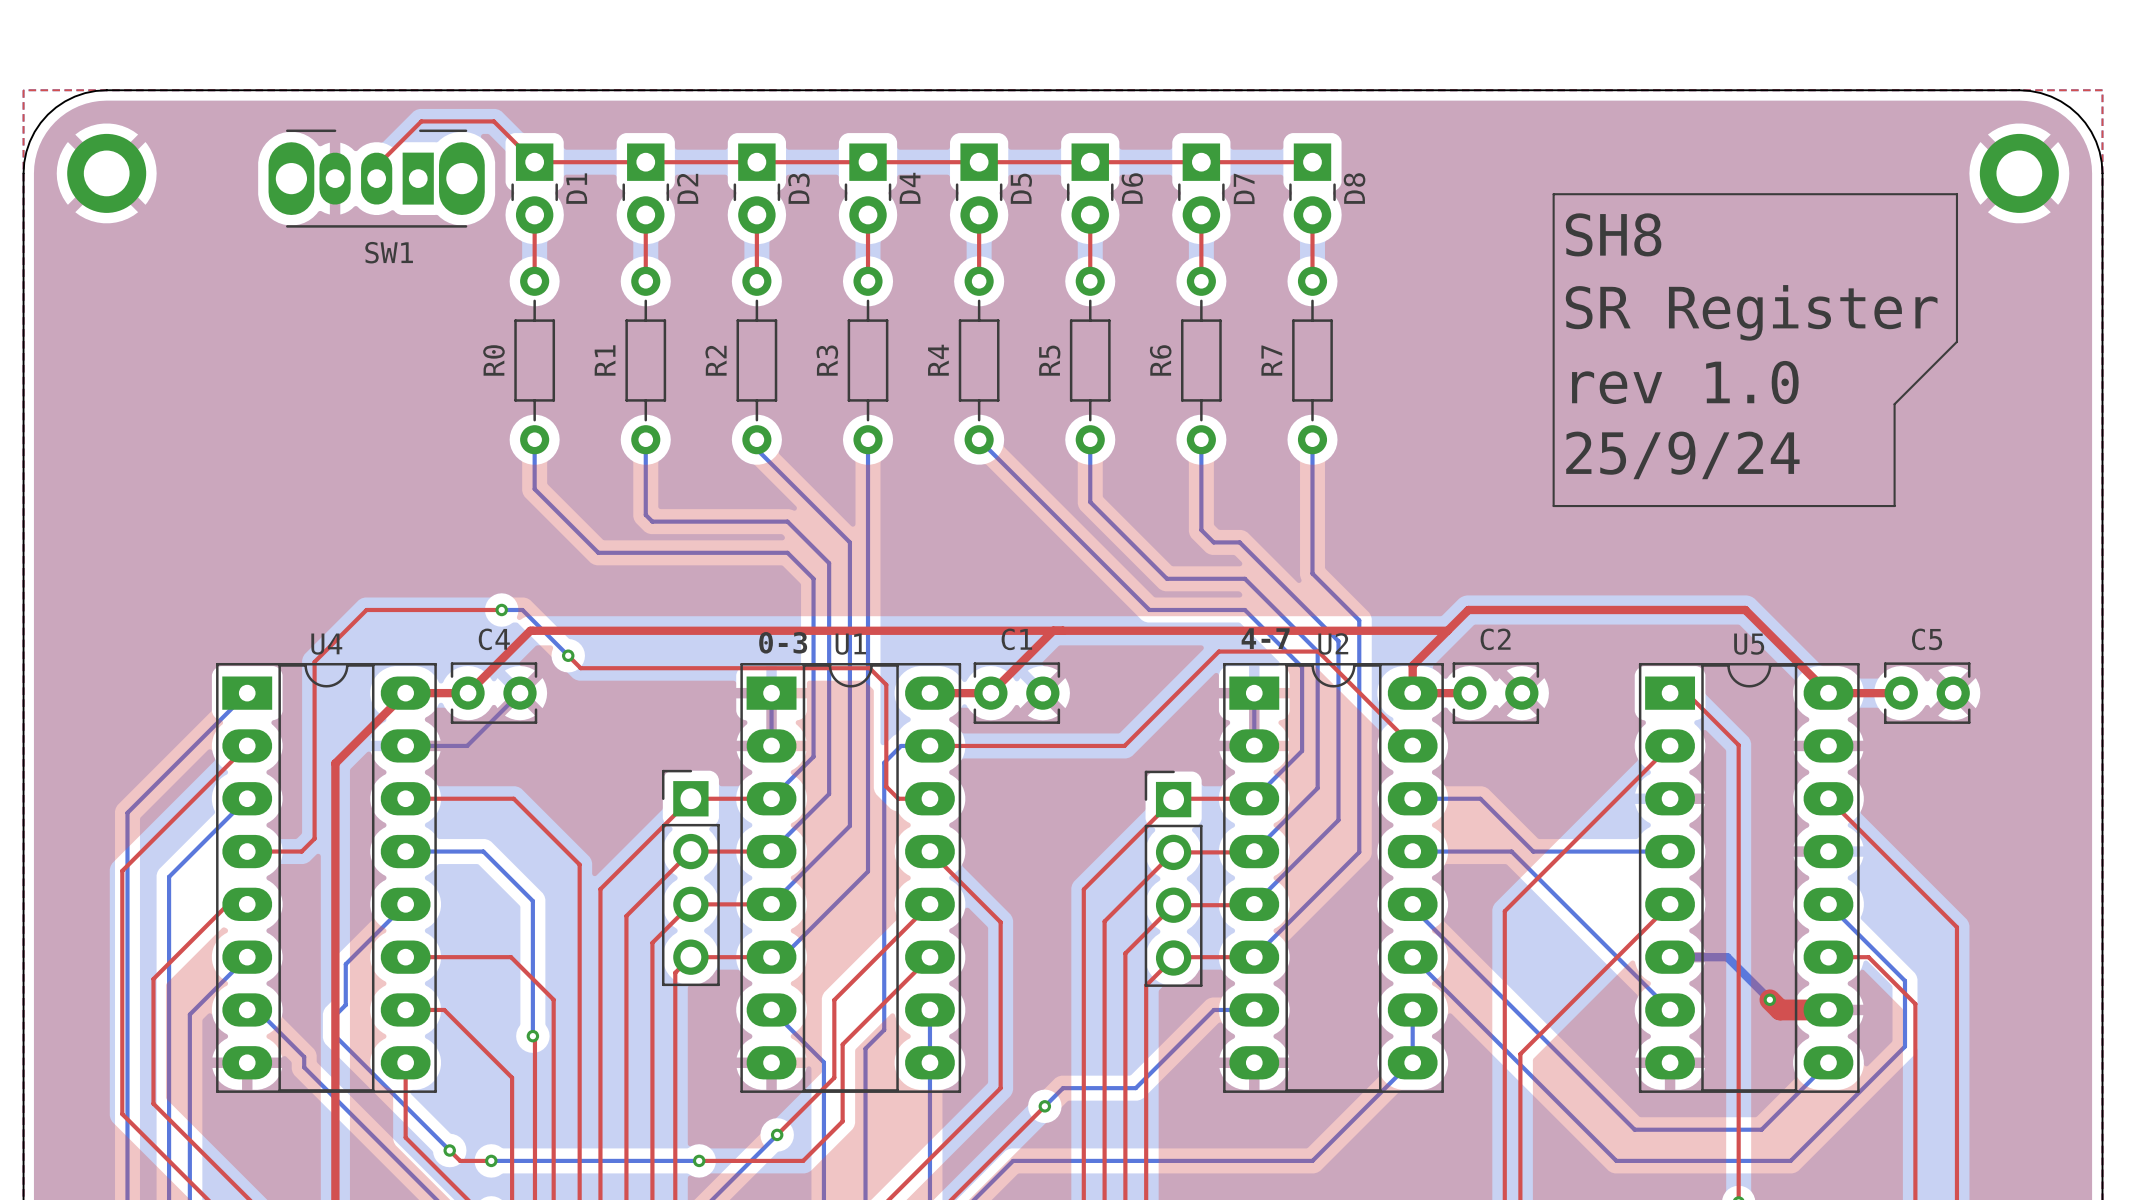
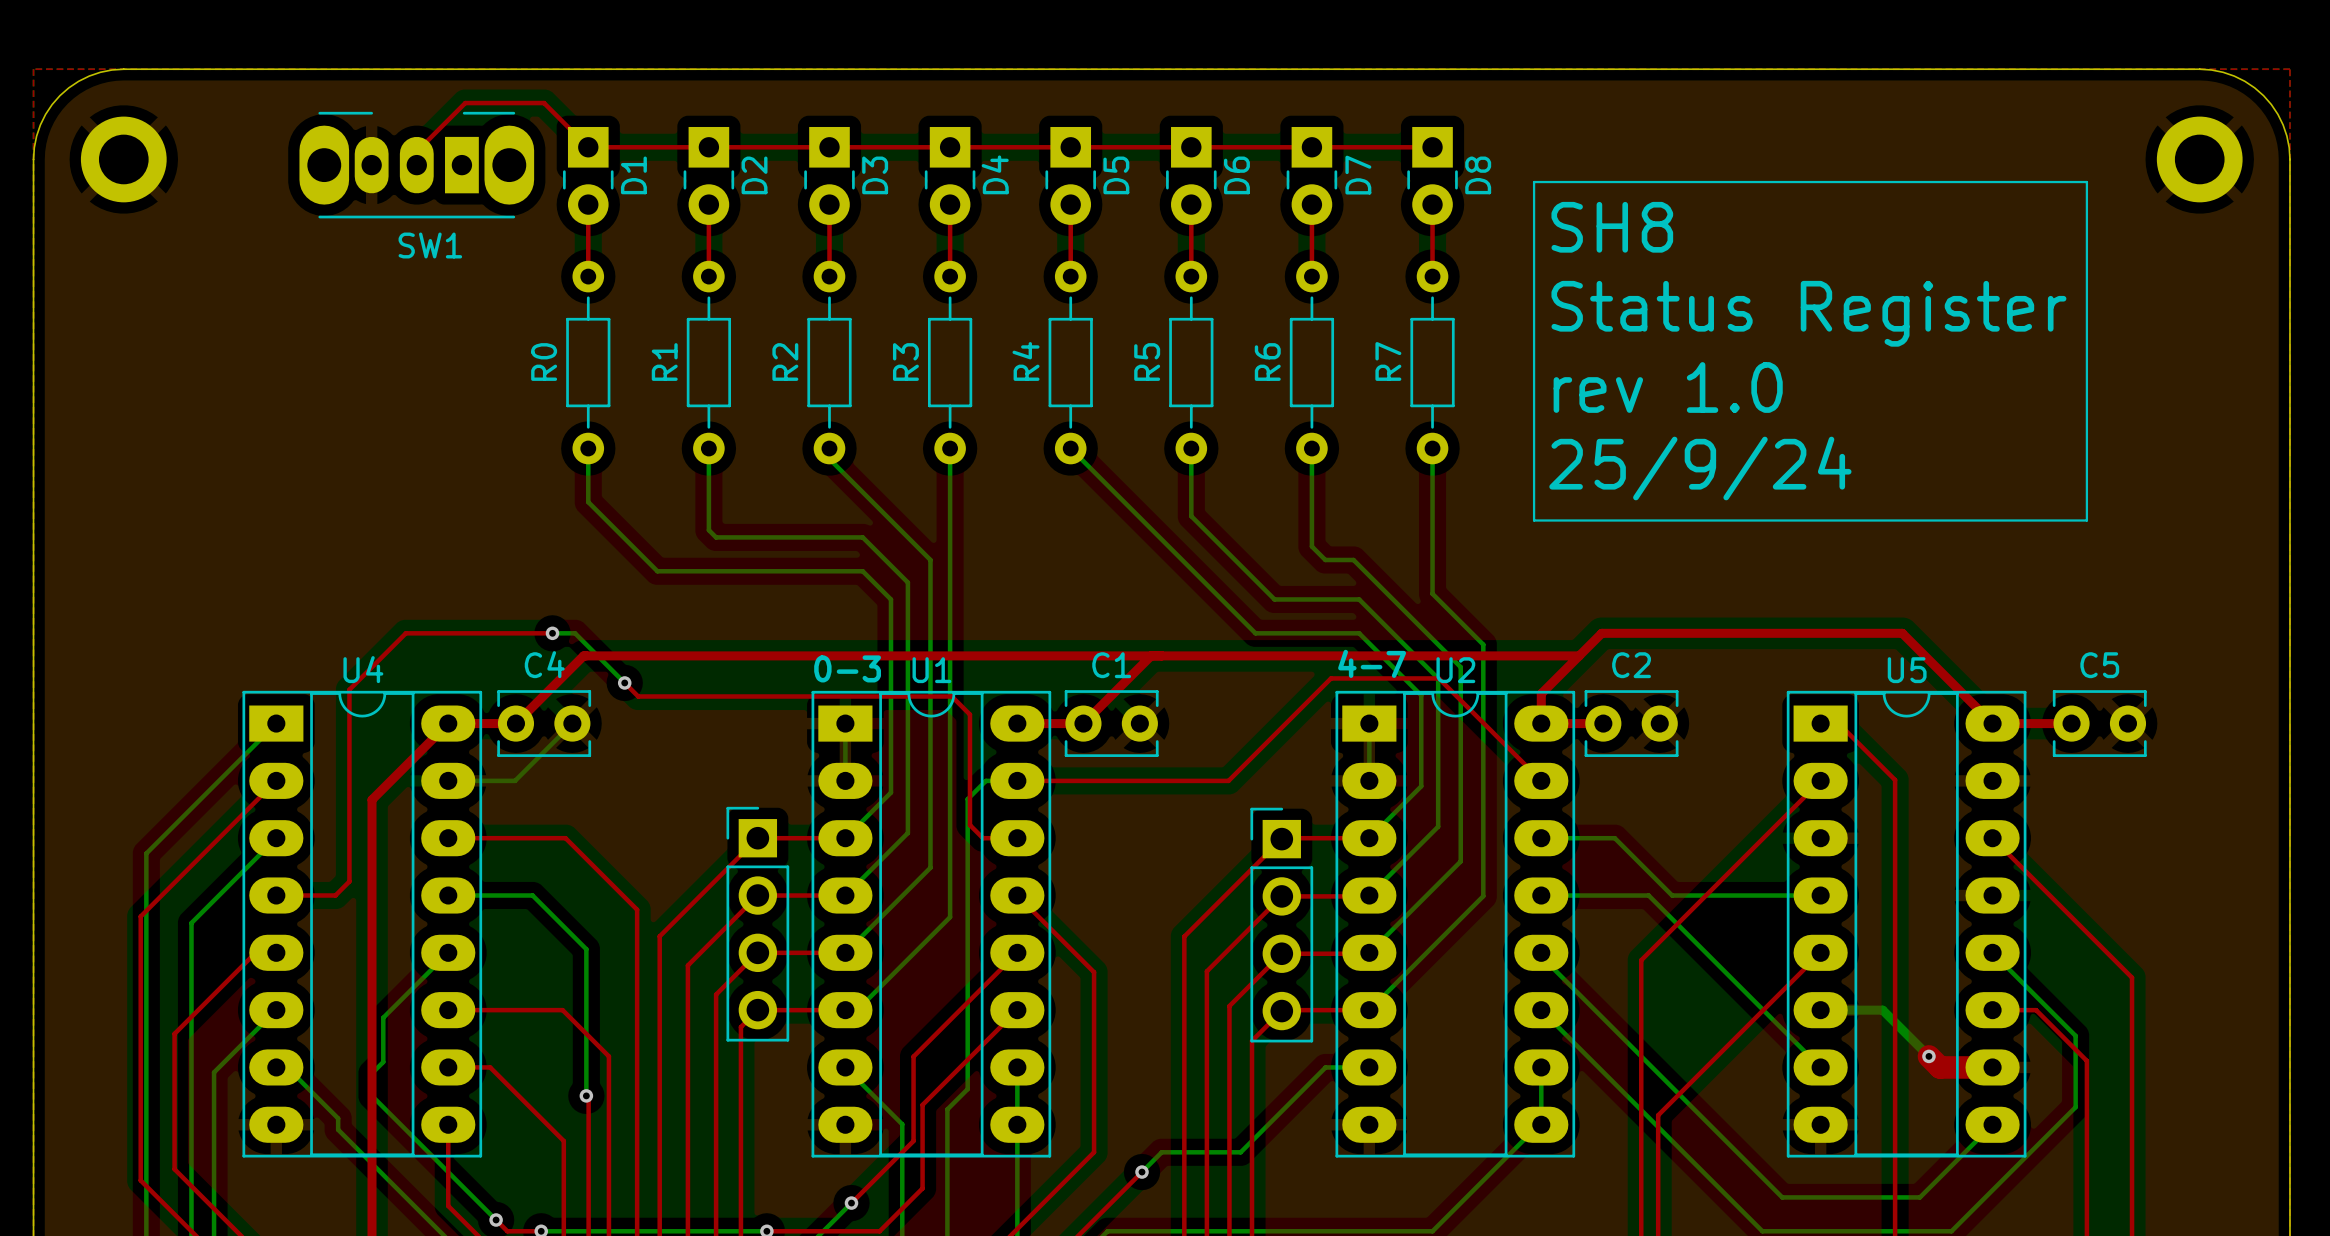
line: (1553, 194) (1553, 506) -> (1694, 182) (1534, 182) (1534, 520) (1694, 520)
line: (1915, 194) (1956, 194) (1956, 341) (1894, 404) (1894, 506) -> (2086, 182) (2086, 520) (2064, 520)
text position: SH8 (1613, 234) -> SH8 (1612, 227)
text: SR Register (1751, 312) -> Status Register (1808, 313)
text position: rev 1.0 (1685, 382) -> rev 1.0 (1668, 387)
text position: 25/9/24 (1682, 455) -> 25/9/24 (1700, 468)

